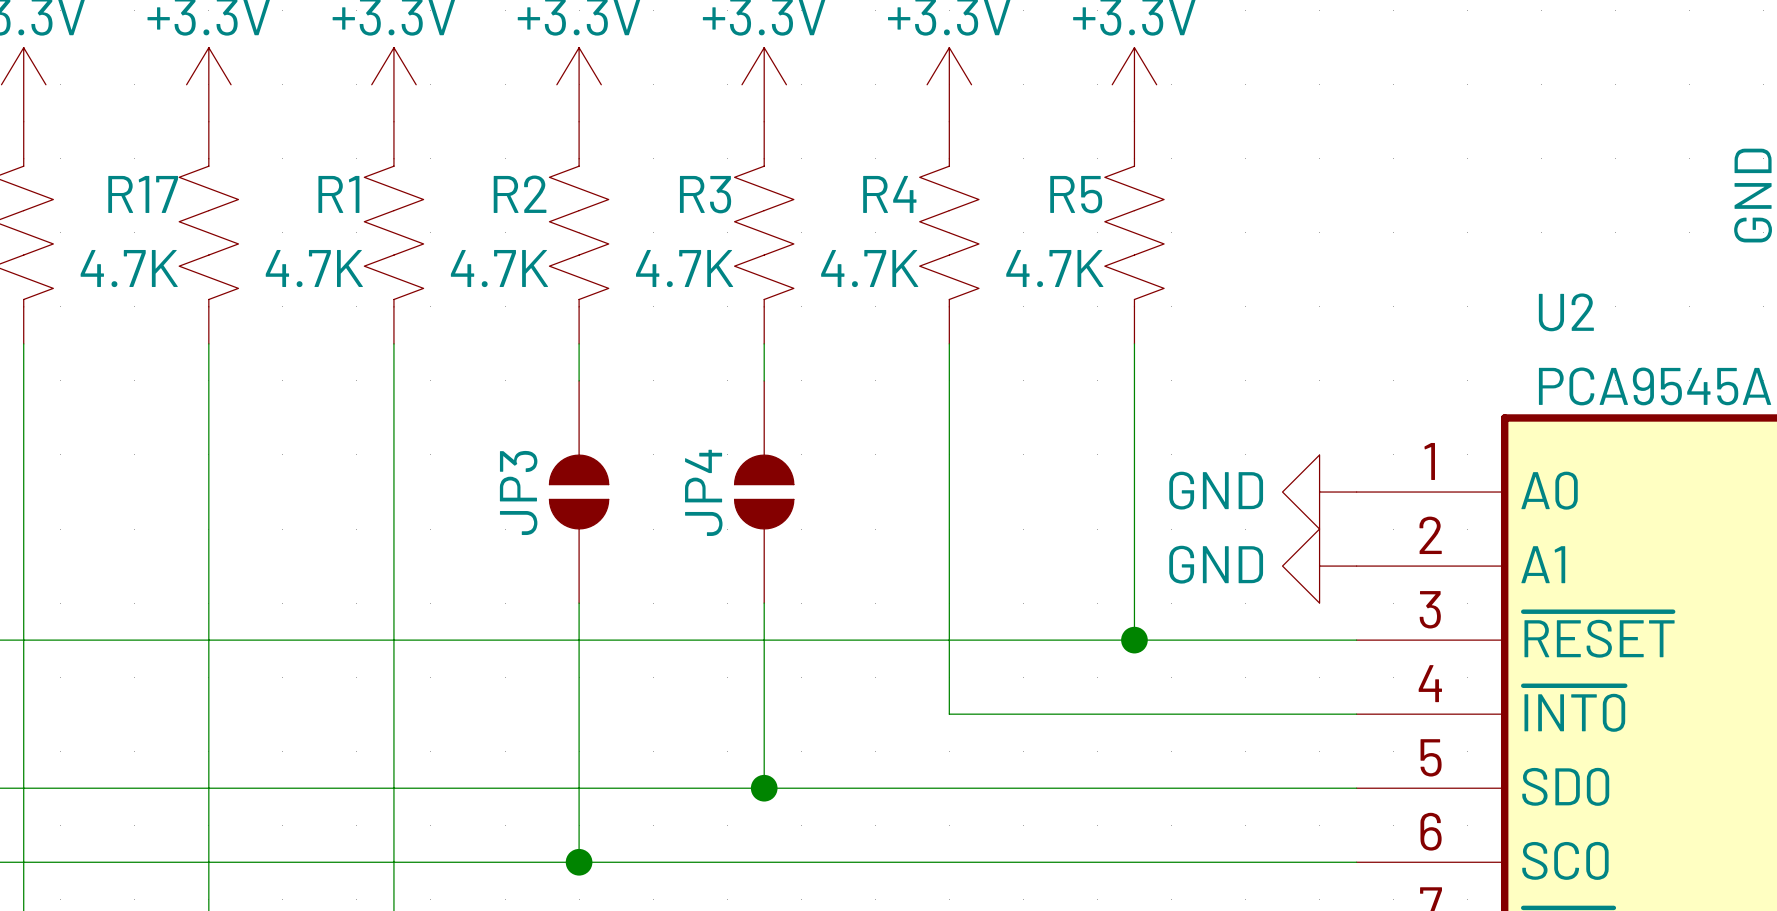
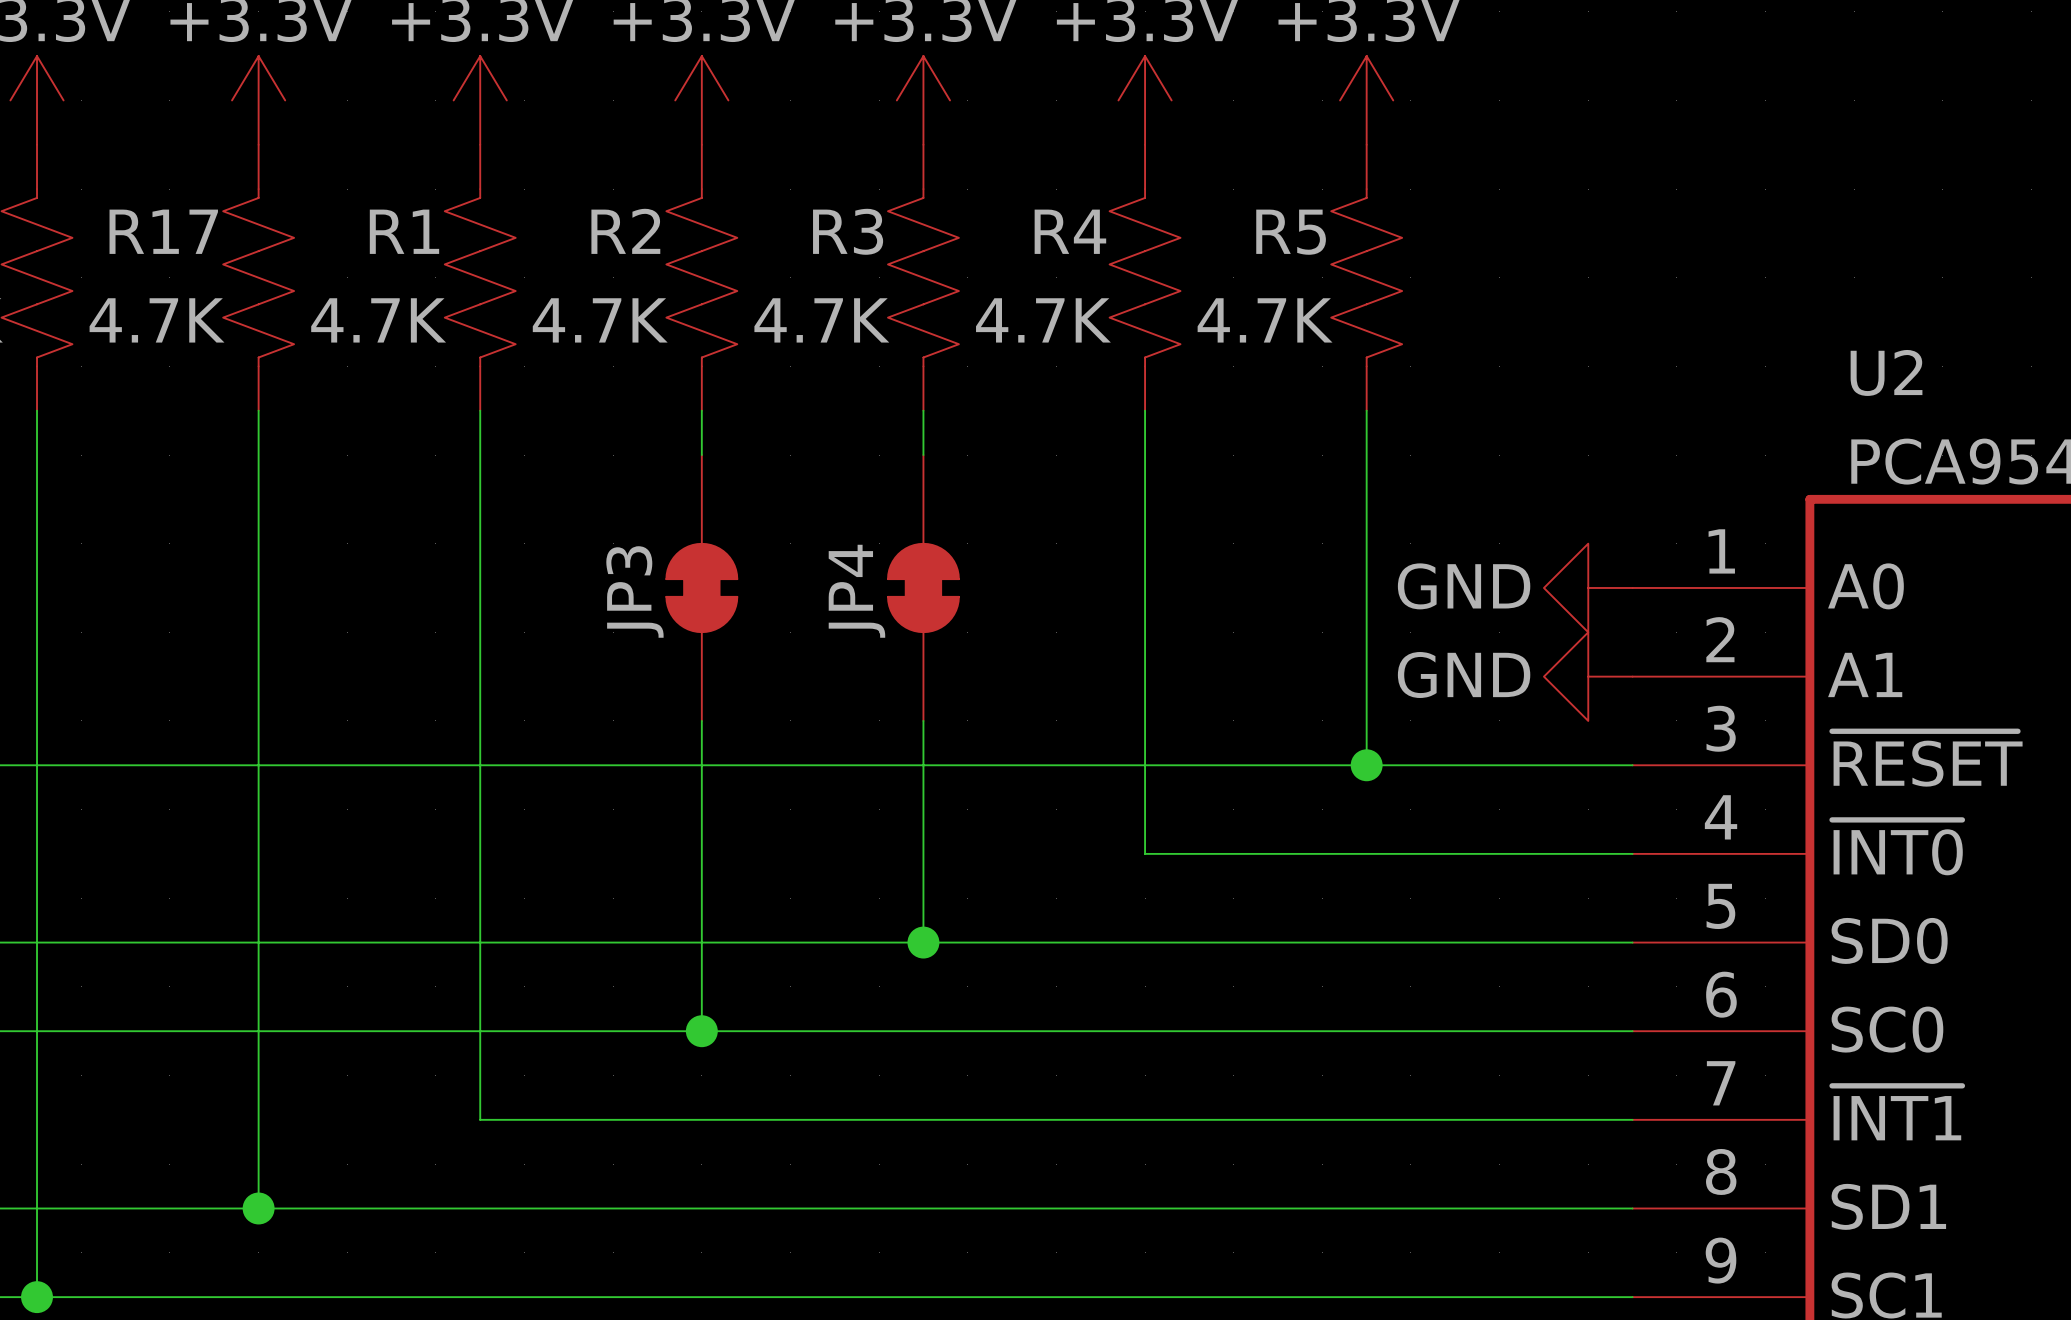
JP3 symbol: [549, 380, 609, 604] -> [666, 455, 738, 721]
JP4 symbol: [734, 380, 794, 604] -> [887, 455, 959, 721]

